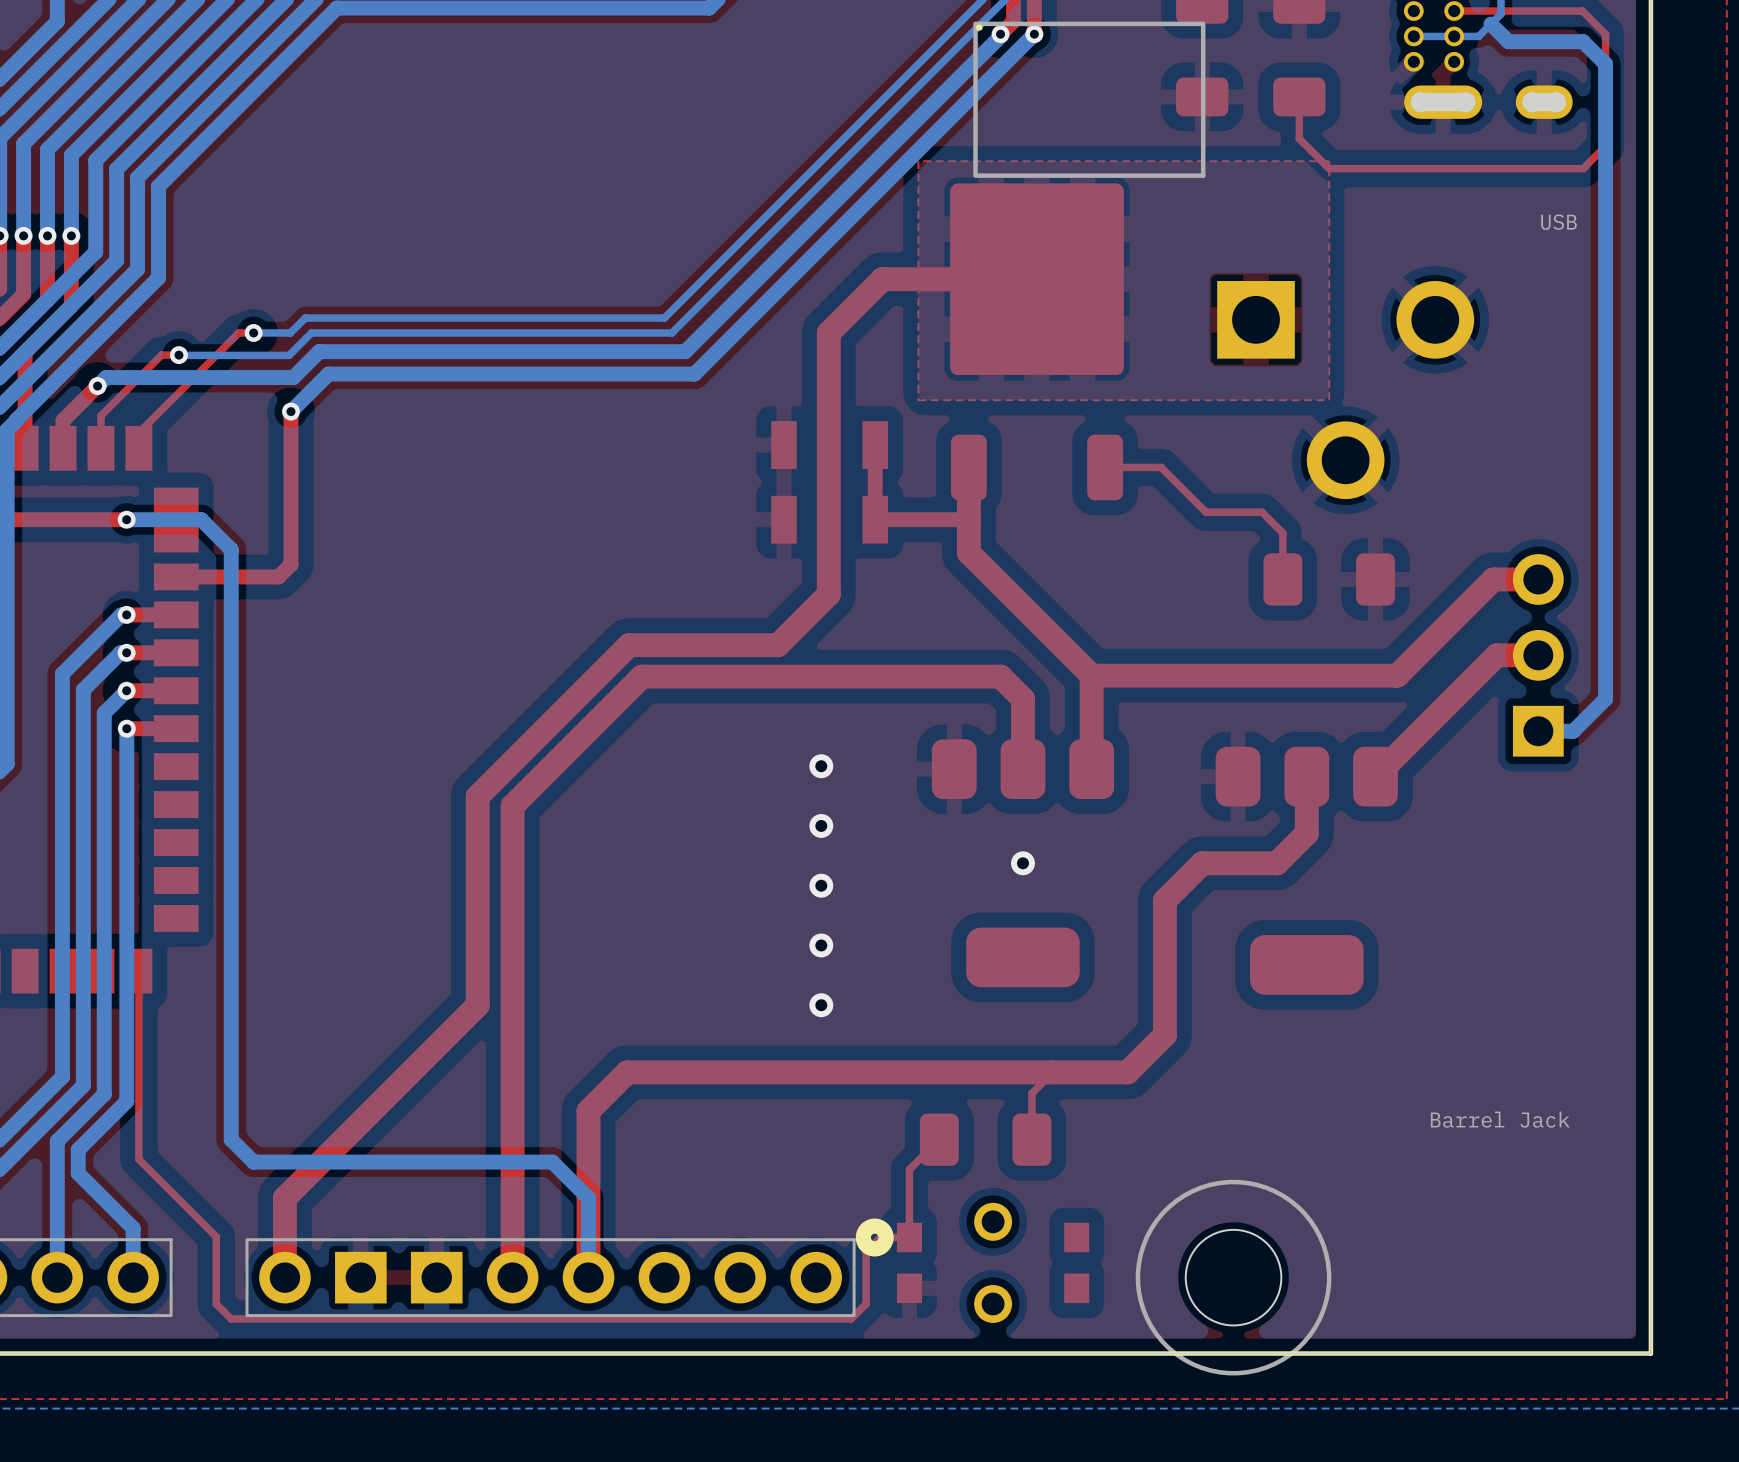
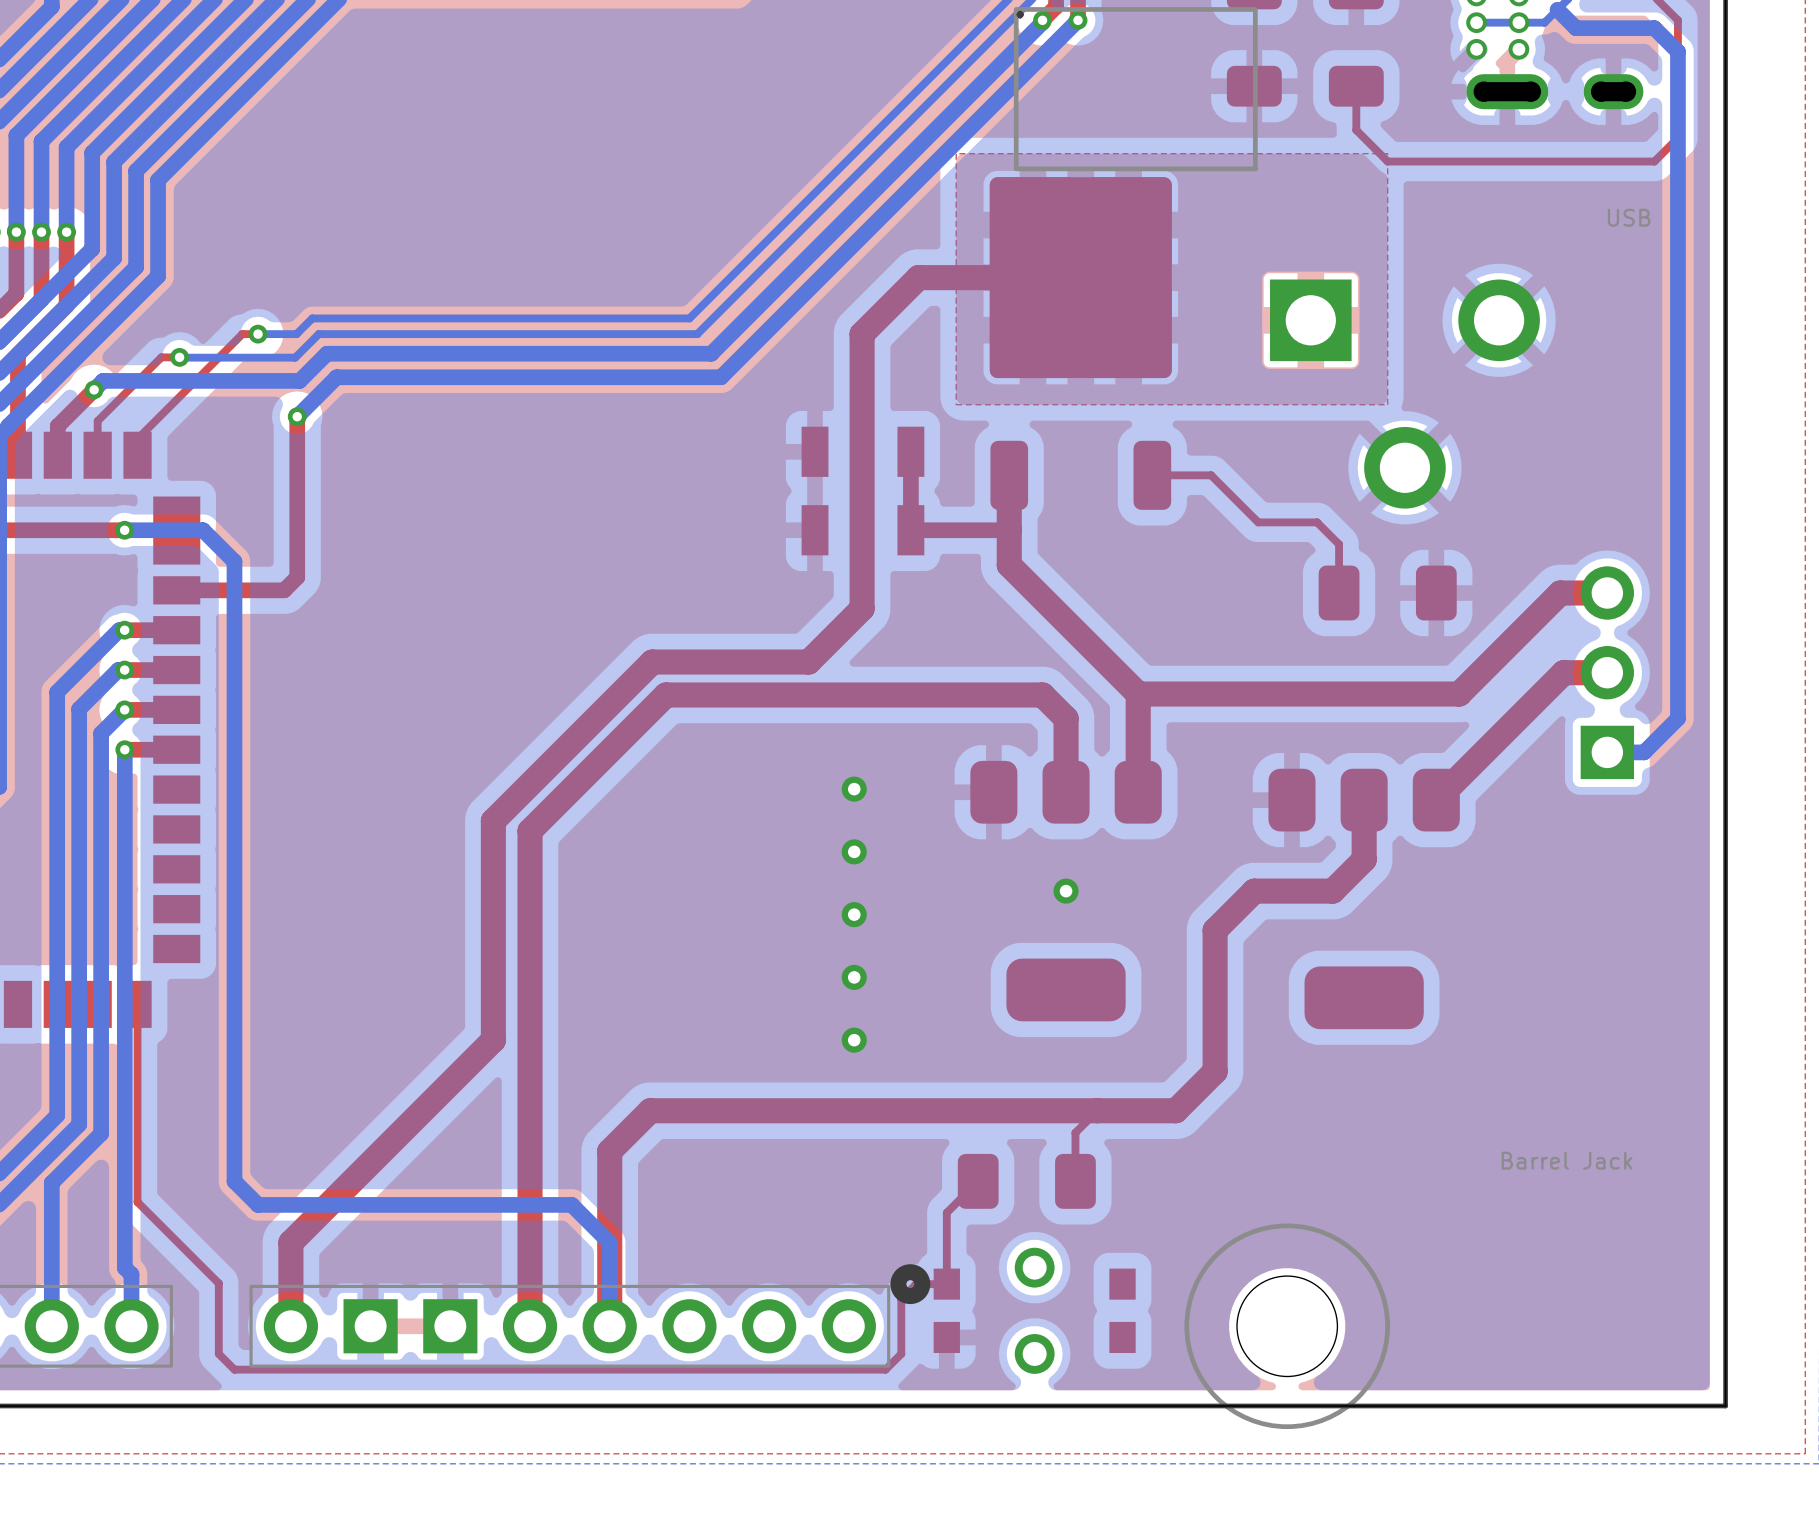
bottom track: (126, 1101) (78, 1149) (78, 1173) (126, 1221) -> (124, 1141) (124, 1267)

